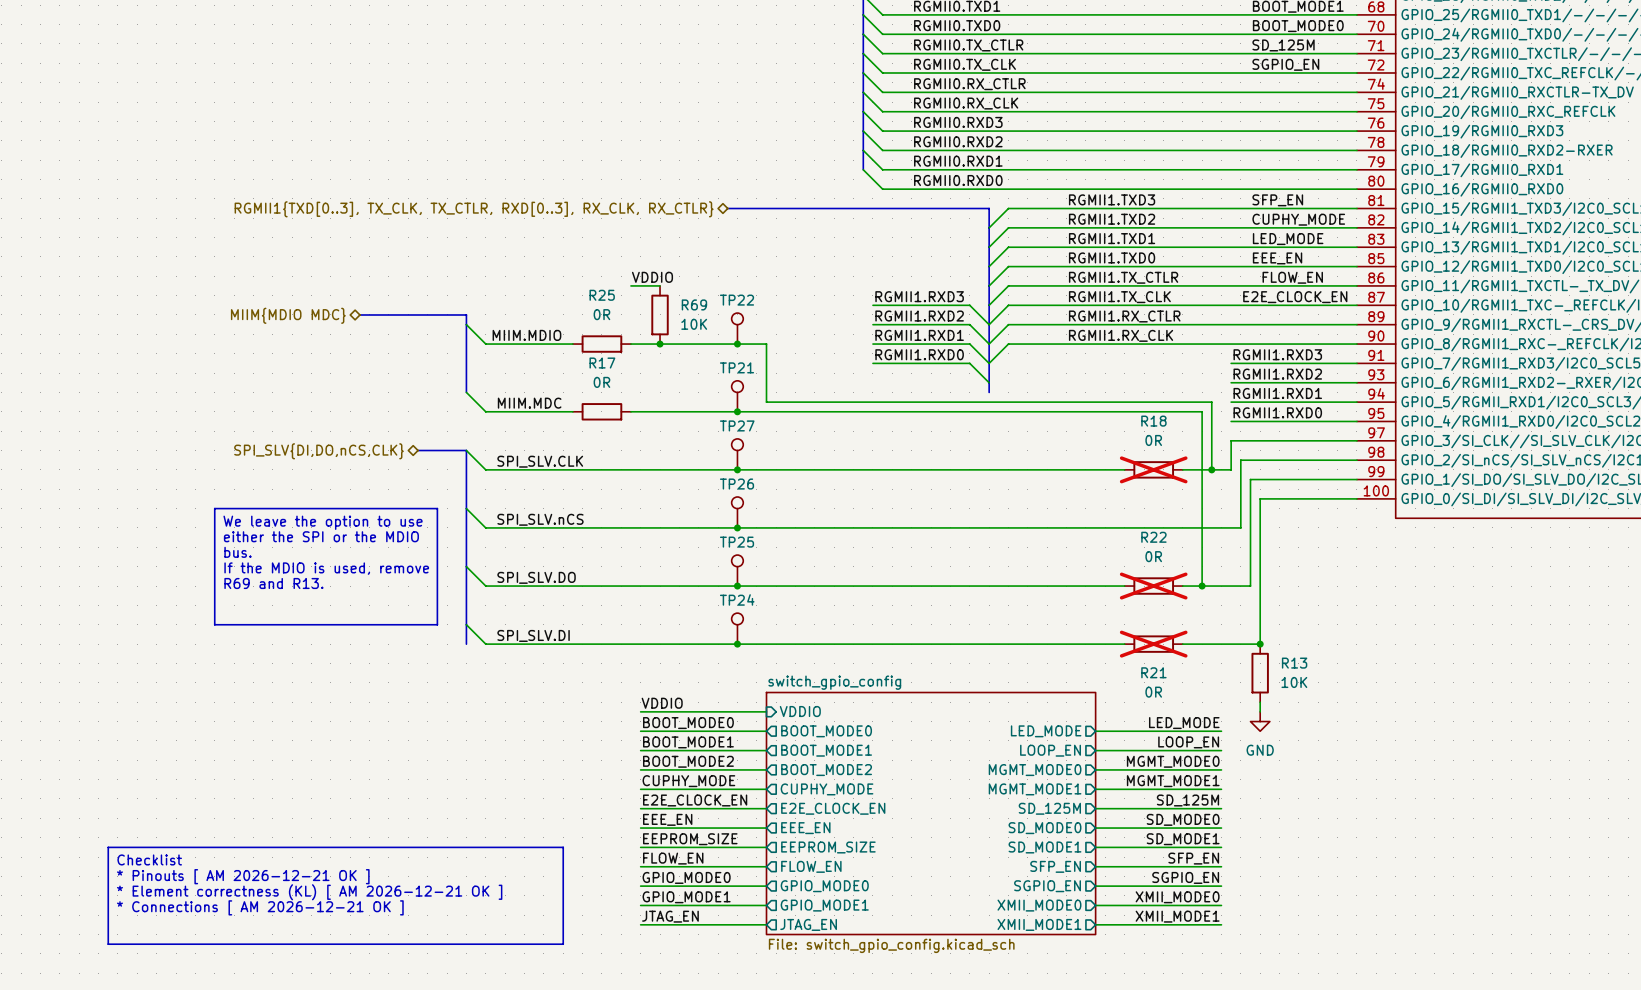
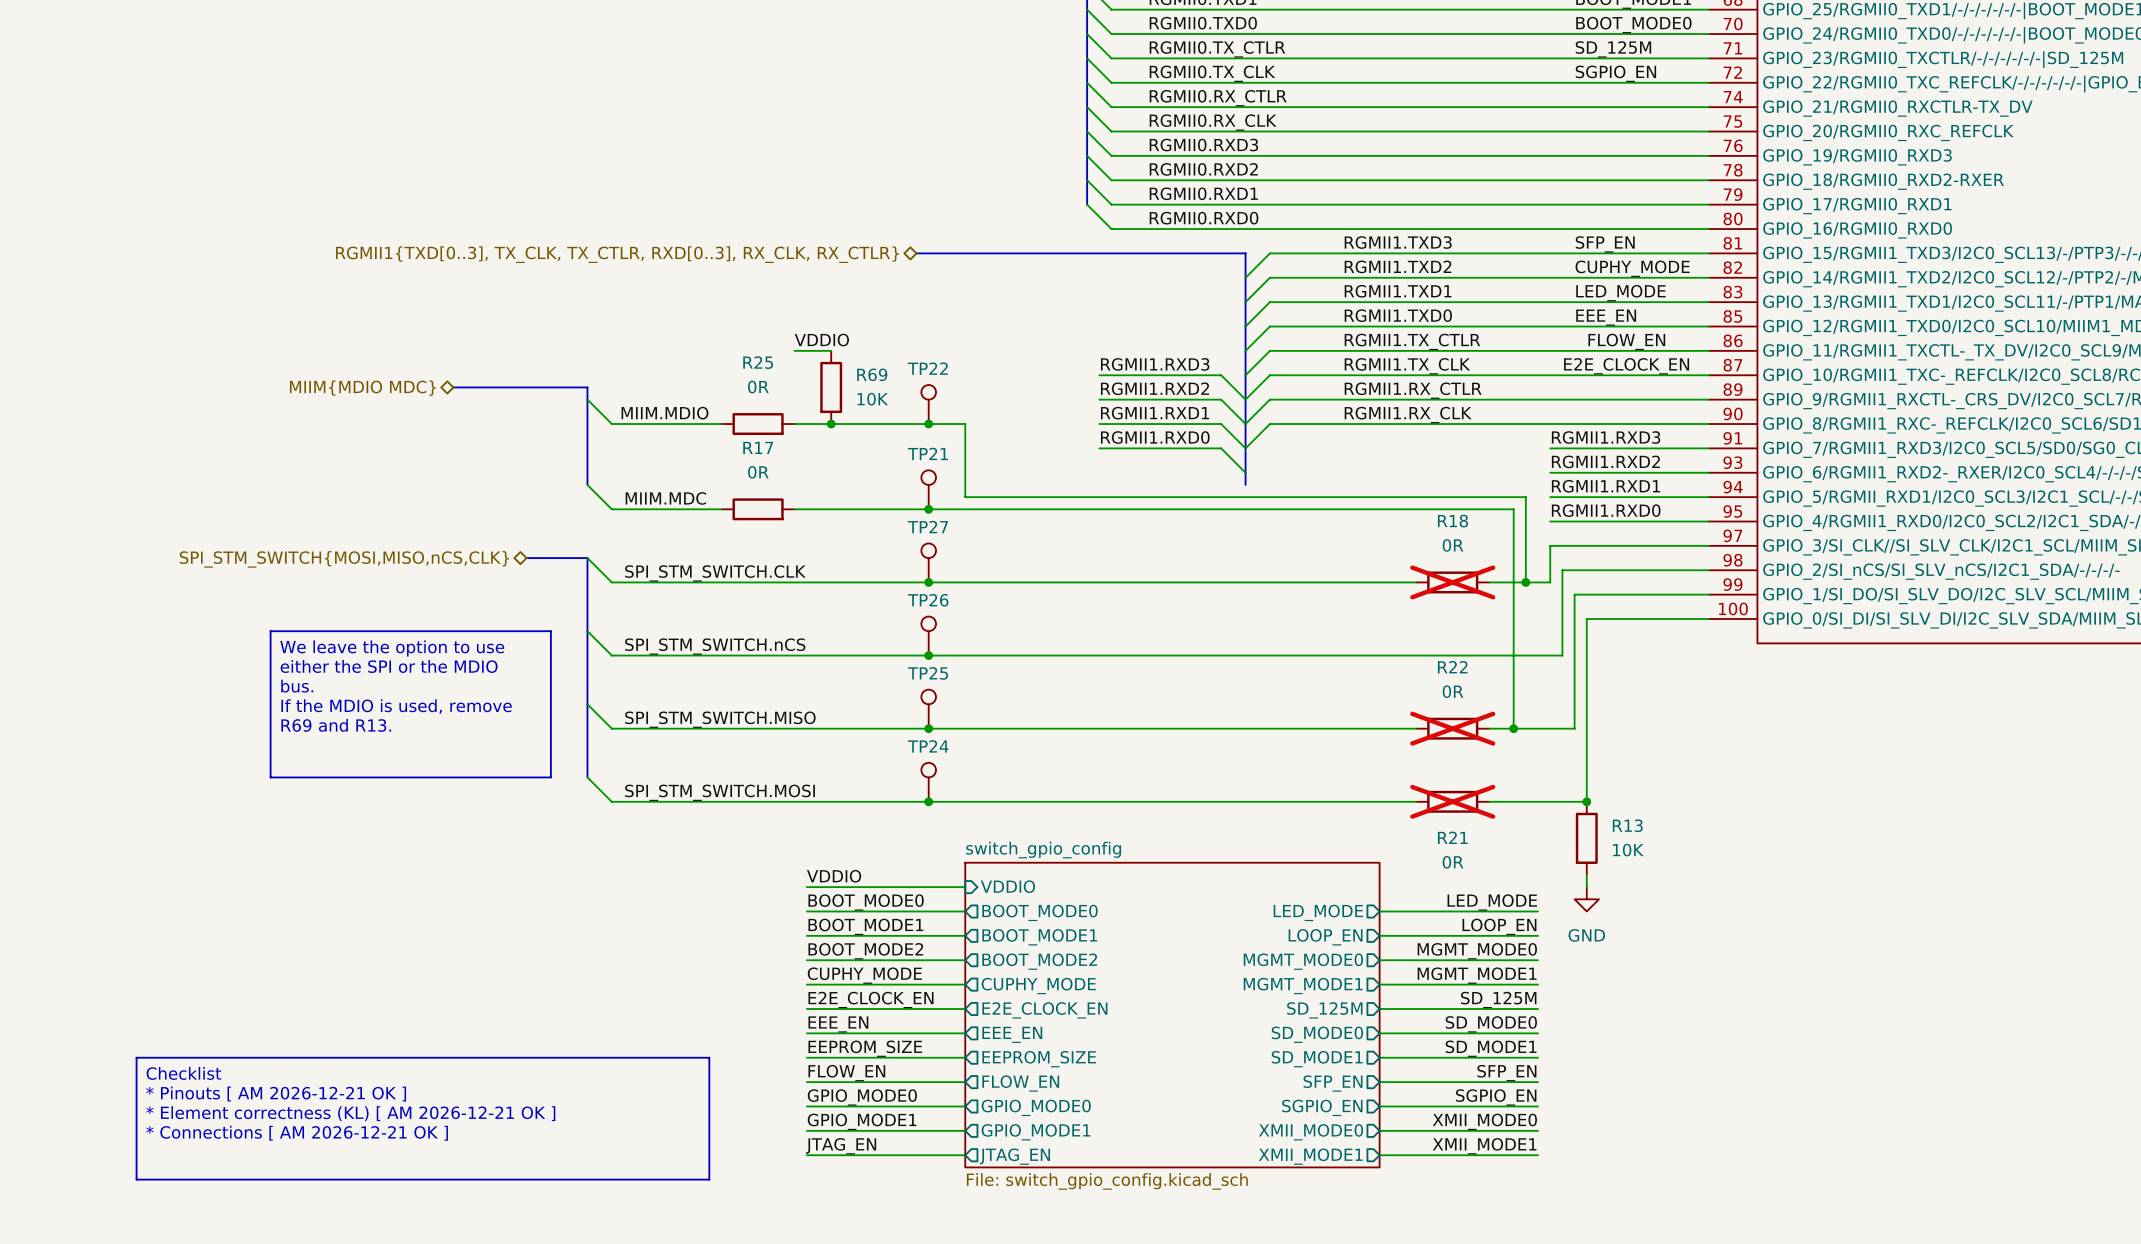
hierarchical label: SPI_SLV{DI,DO,nCS,CLK} (318, 451) -> SPI_STM_SWITCH{MOSI,MISO,nCS,CLK} (344, 559)
label: SPI_SLV.CLK (540, 461) -> SPI_STM_SWITCH.CLK (715, 573)
label: SPI_SLV.nCS (540, 519) -> SPI_STM_SWITCH.nCS (715, 646)
label: SPI_SLV.DO (536, 577) -> SPI_STM_SWITCH.MISO (720, 719)
bus: (466, 624) (466, 644) -> none
label: SPI_SLV.DI (533, 635) -> SPI_STM_SWITCH.MOSI (720, 792)

